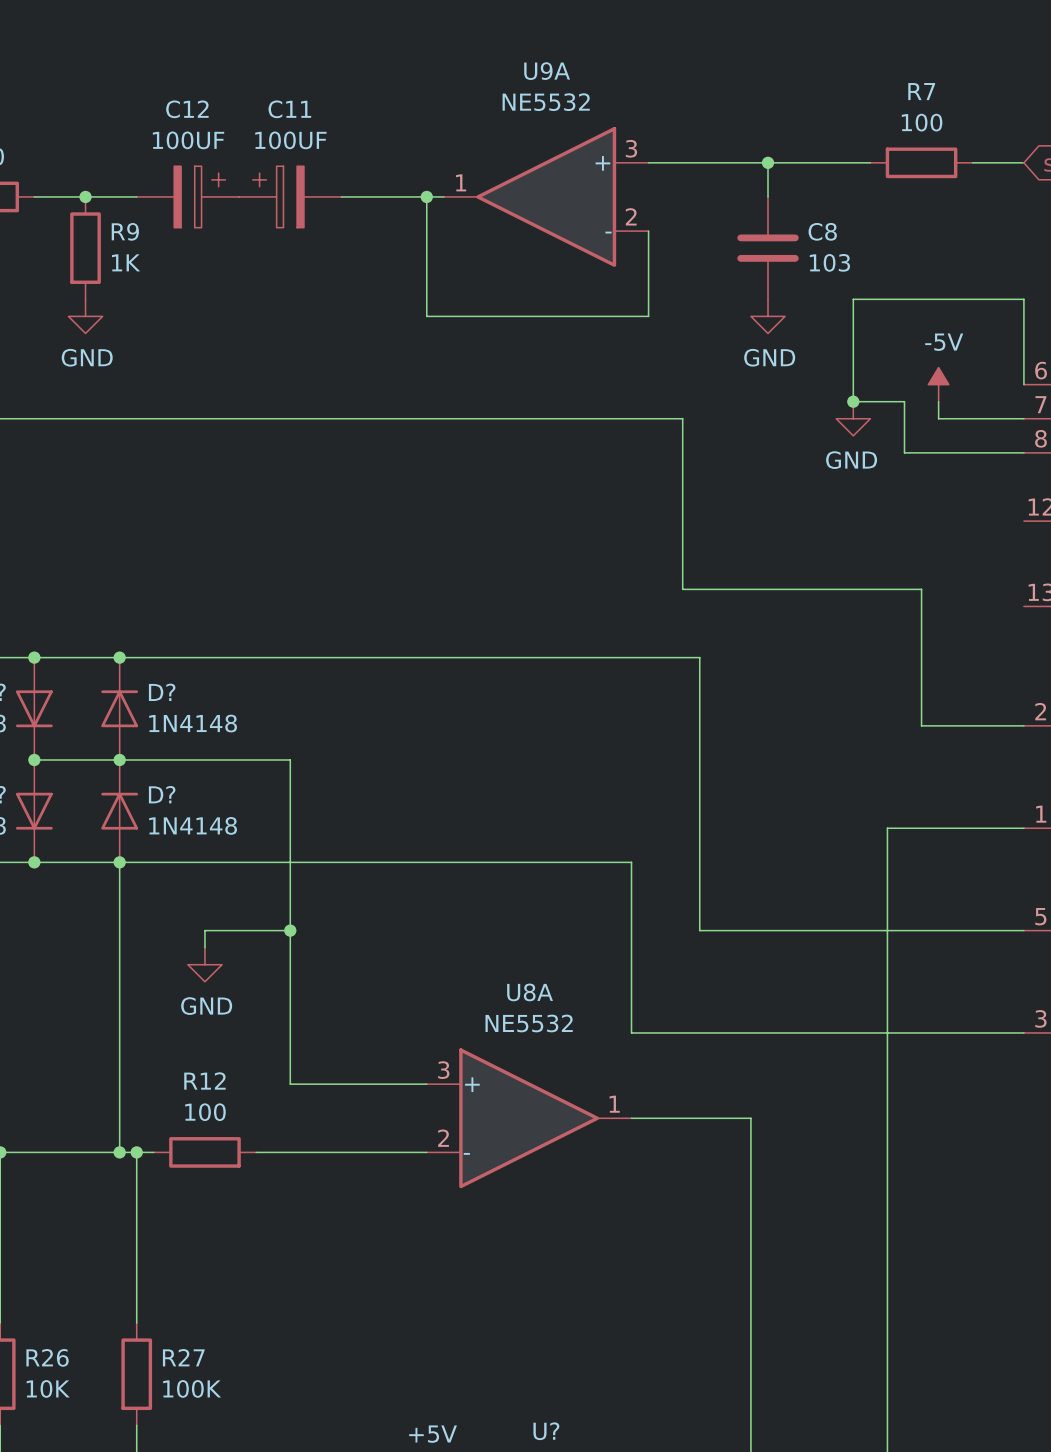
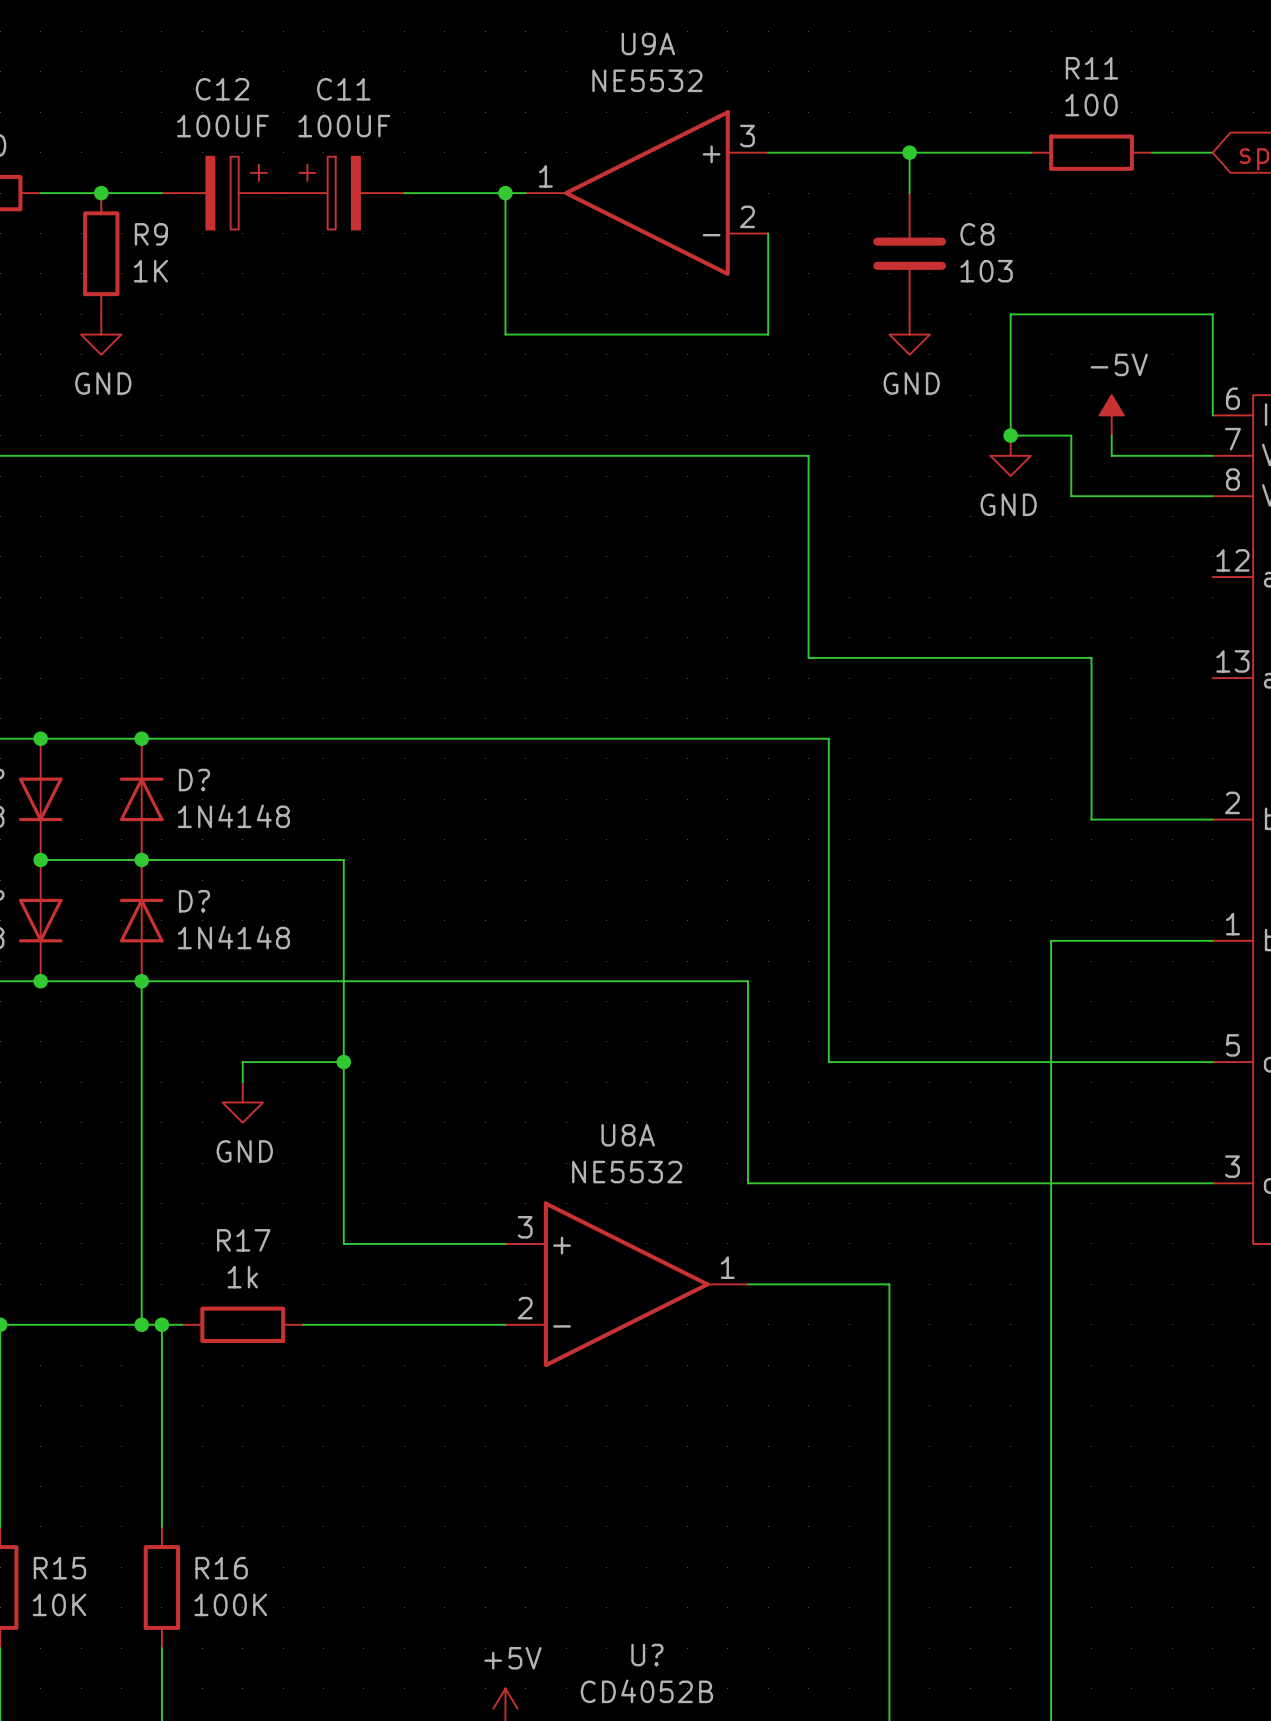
R7 name: R7 (921, 91) -> R11 (1091, 68)
R12 name: R12 (204, 1080) -> R17 (243, 1240)
R12 value: 100 (205, 1112) -> 1k (242, 1277)
R26 name: R26 (47, 1357) -> R15 (59, 1568)
R27 name: R27 (183, 1357) -> R16 (221, 1568)

